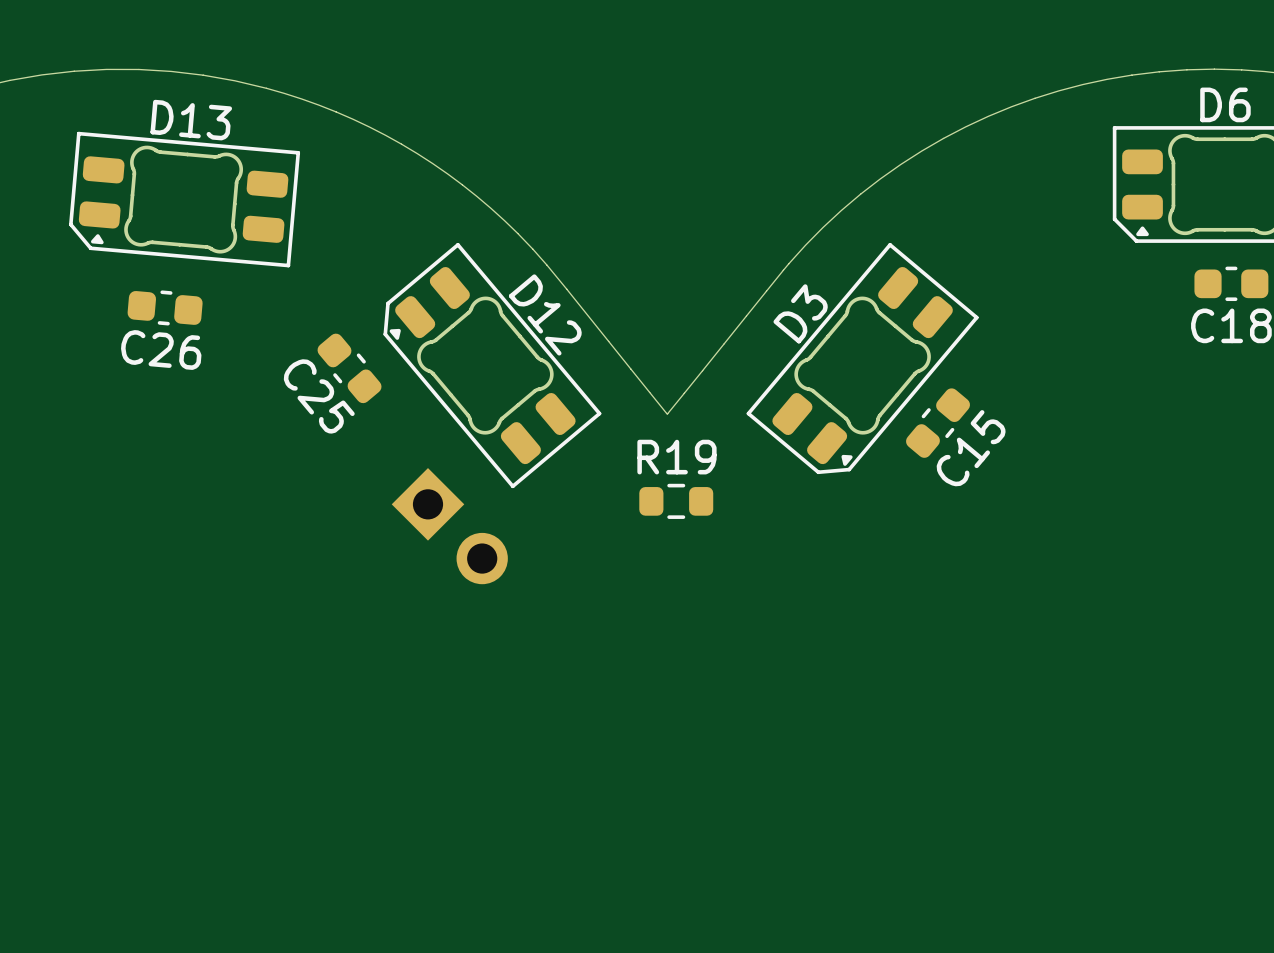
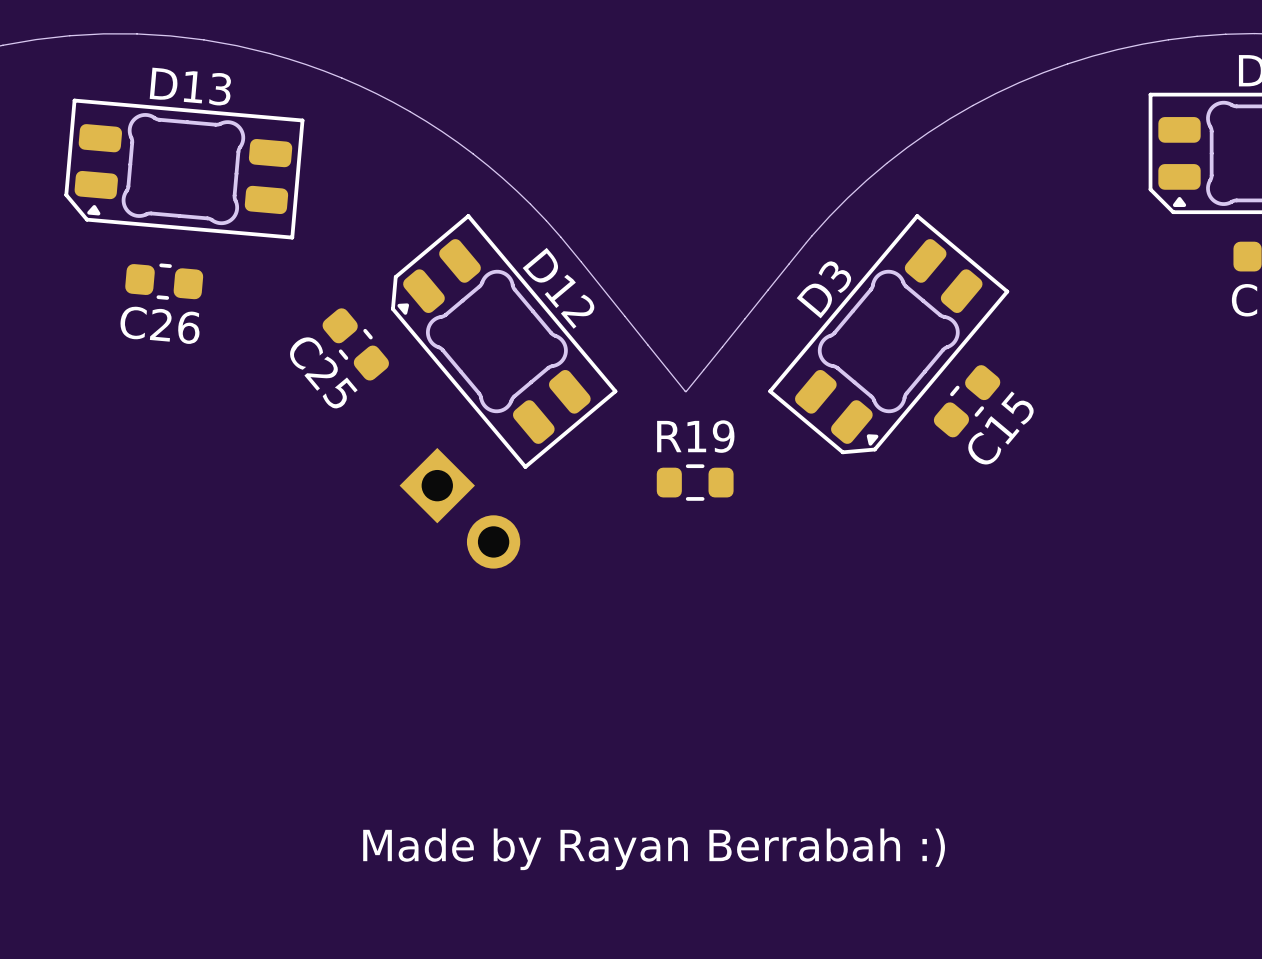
text: none -> Made by Rayan Berrabah :) (654, 849)

